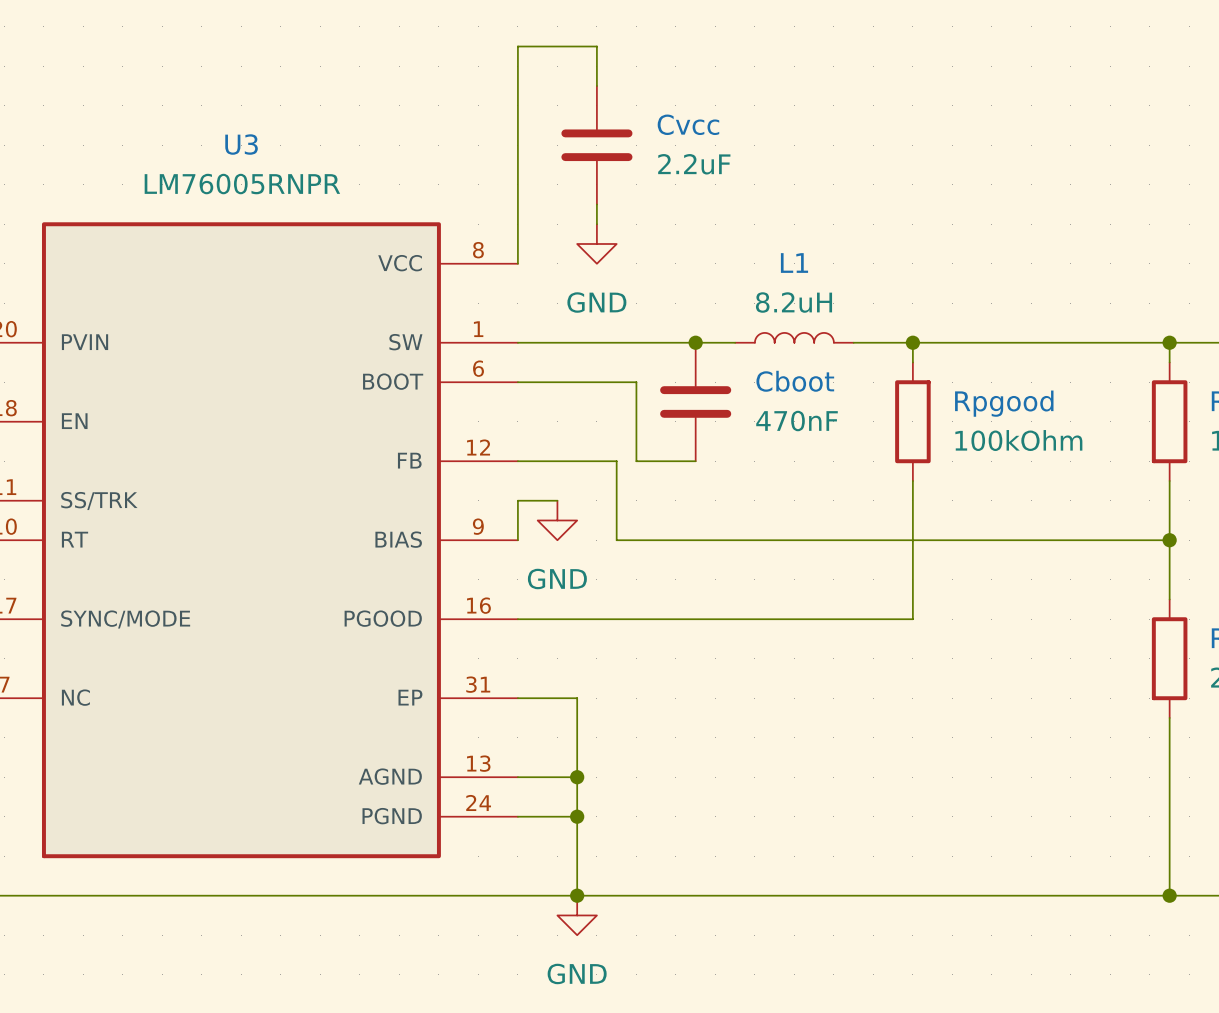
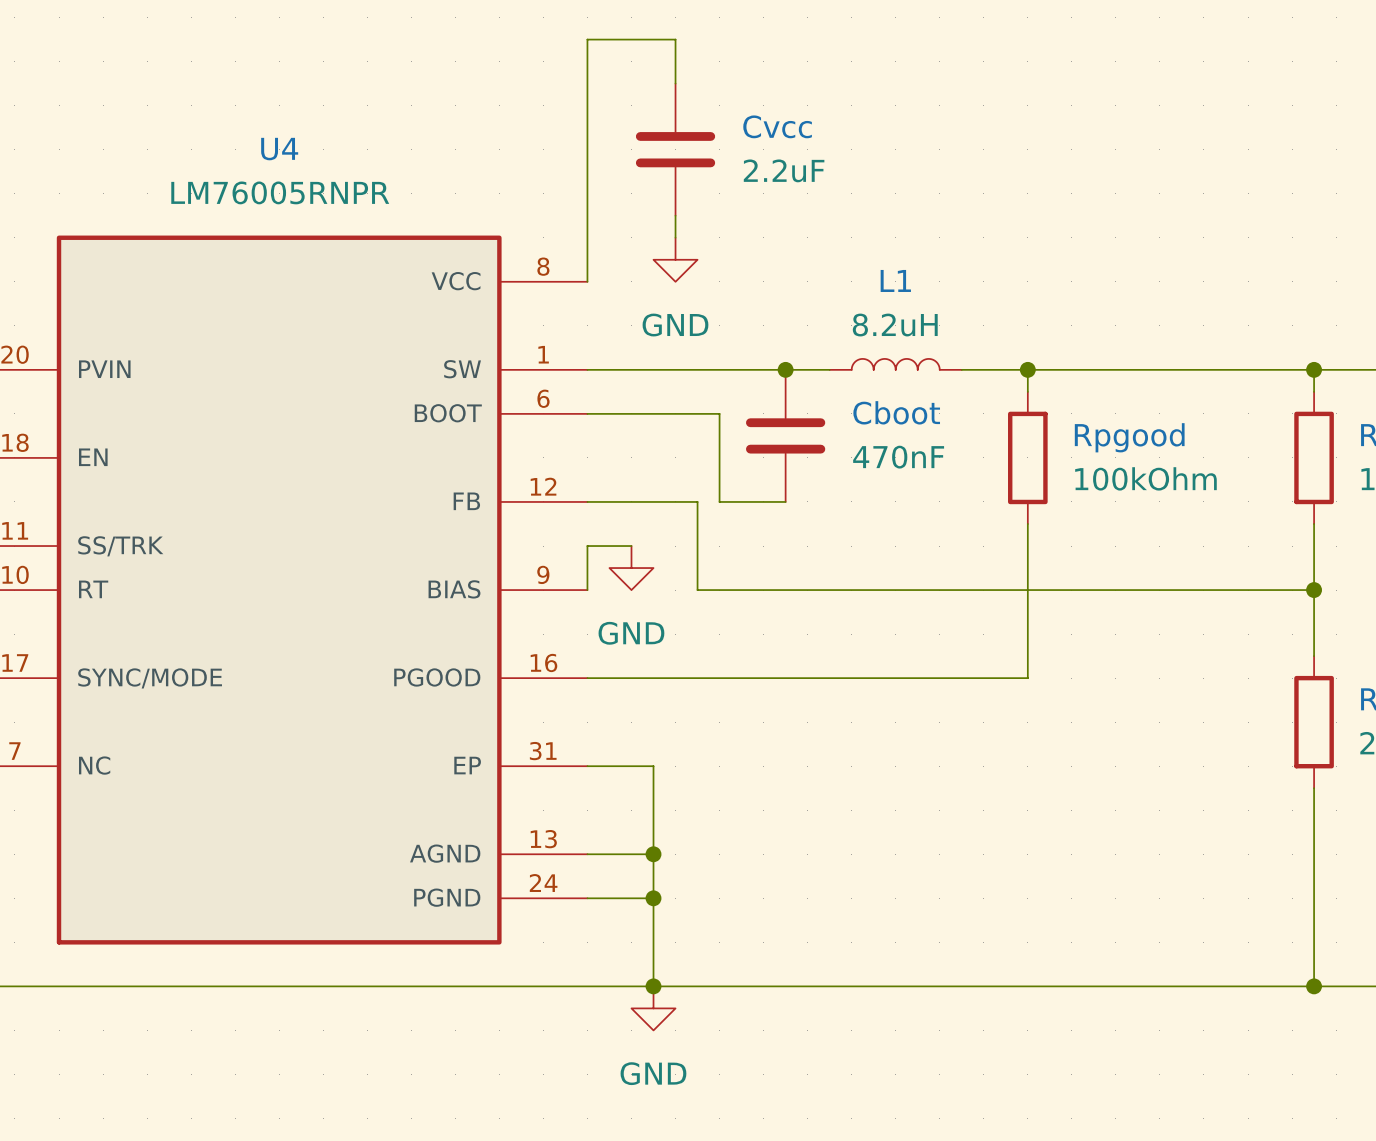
U3 name: U3 (241, 144) -> U4 (279, 149)

